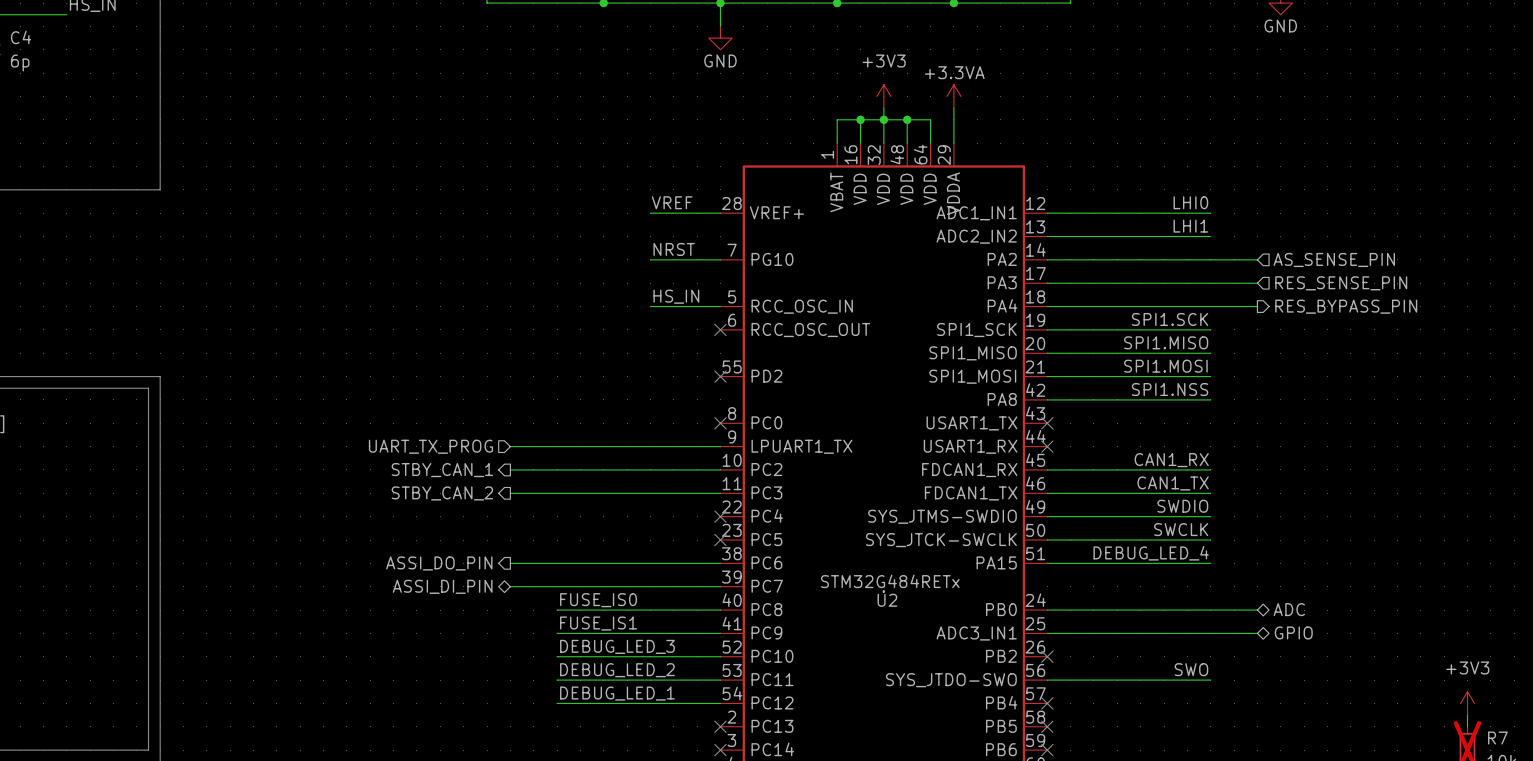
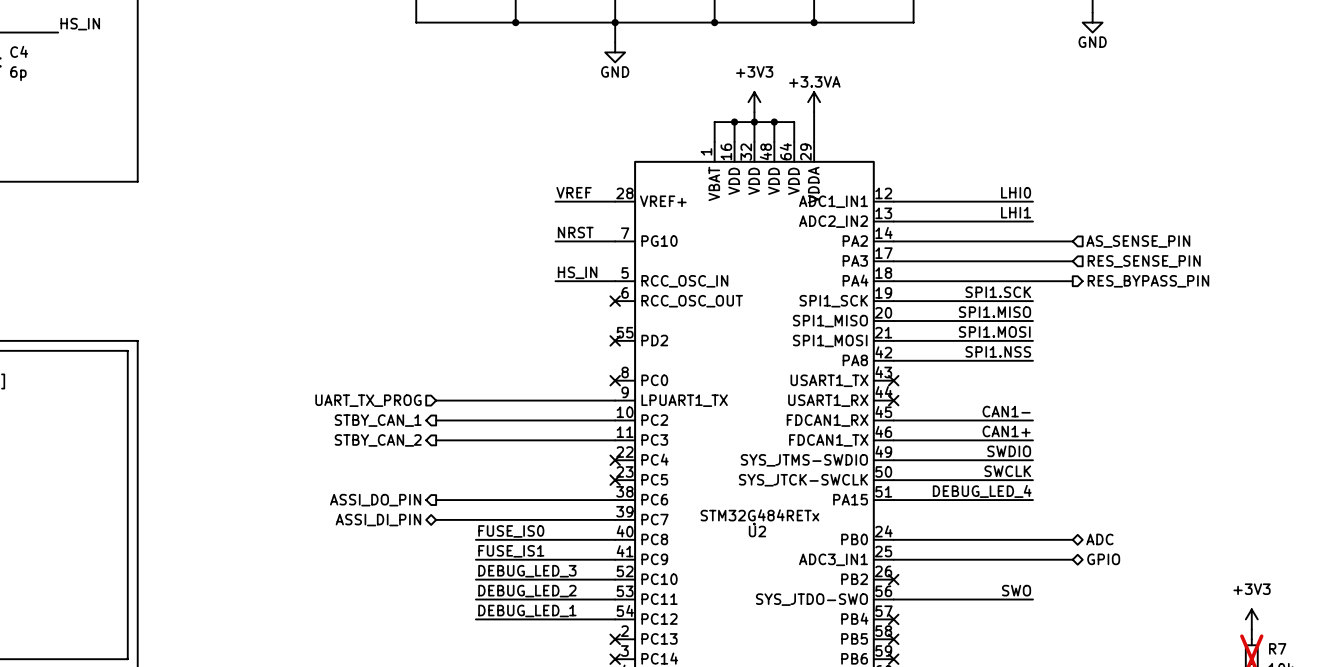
label: CAN1_RX (1171, 460) -> CAN1- (1006, 411)
label: CAN1_TX (1173, 483) -> CAN1+ (1006, 431)

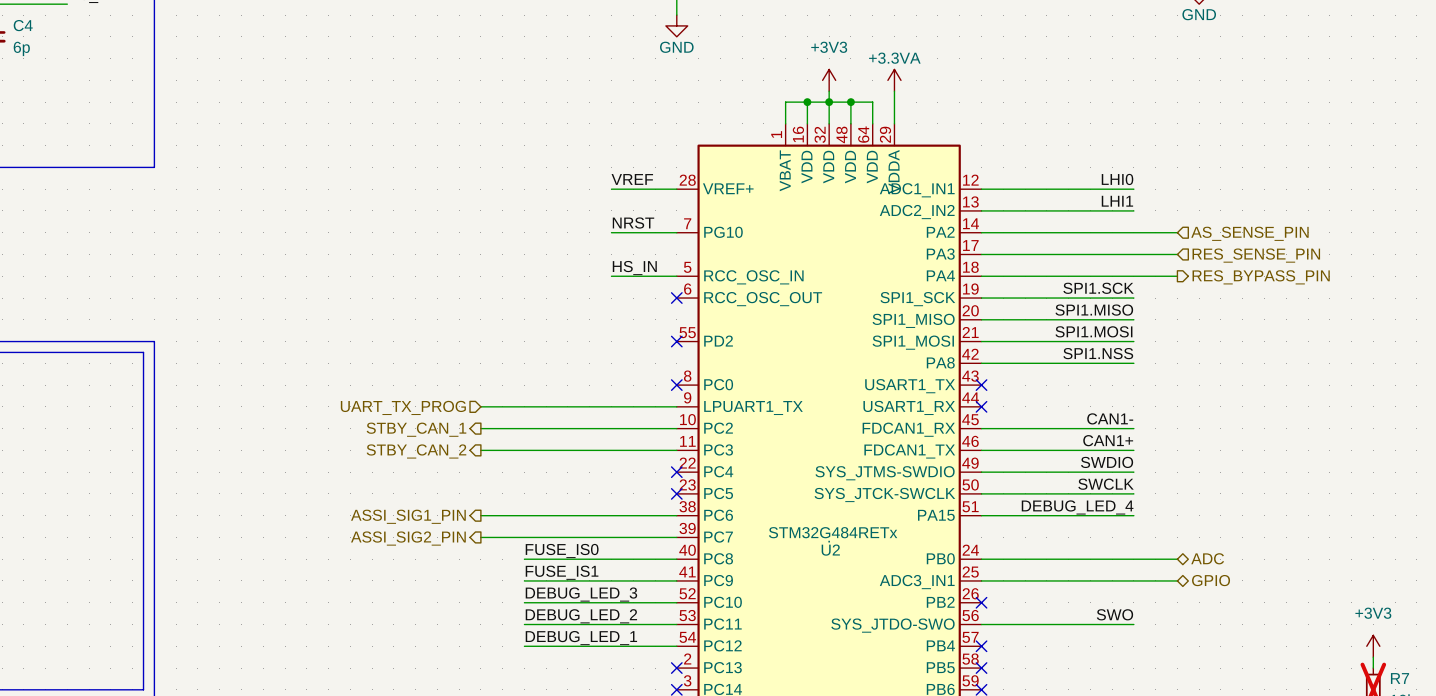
hierarchical label: ASSI_DO_PIN (375, 500) -> ASSI_SIG1_PIN (408, 516)
hierarchical label shape: bidirectional (378, 520) -> output (408, 538)
hierarchical label: ASSI_DI_PIN (378, 520) -> ASSI_SIG2_PIN (408, 538)

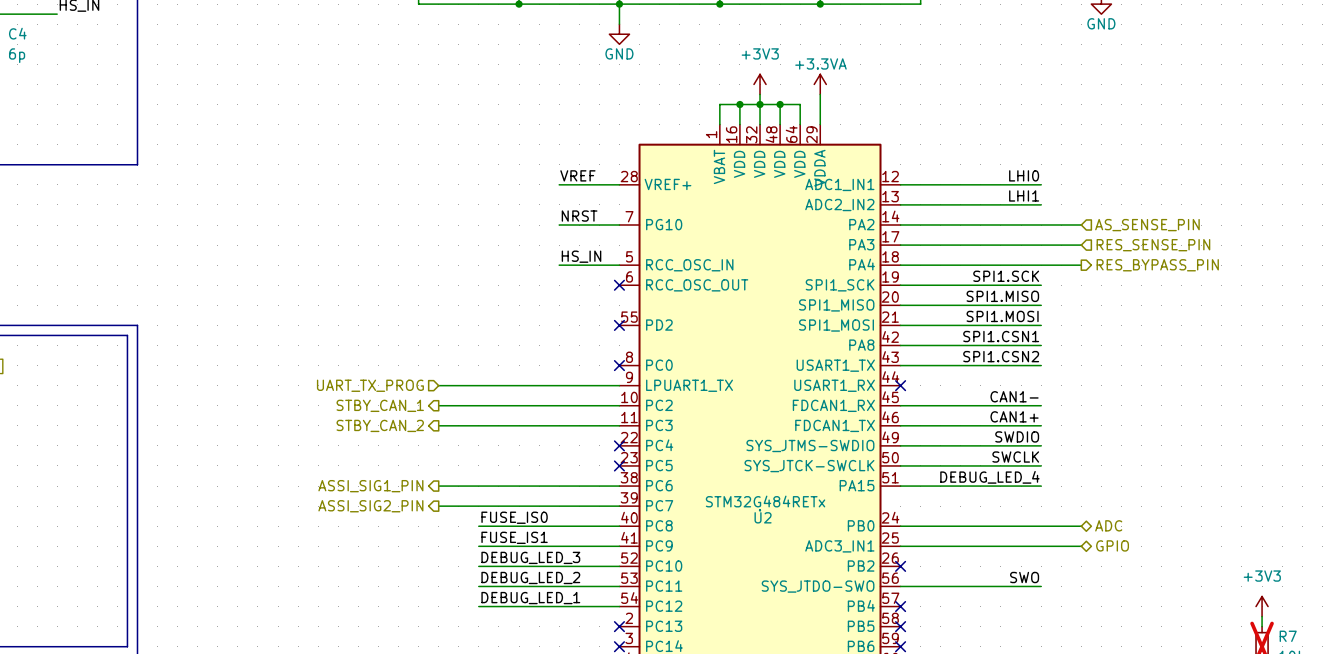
label: SPI1.NSS (1098, 353) -> SPI1.CSN1 (1001, 336)
label: none -> SPI1.CSN2 (1001, 356)
wire: none -> (900, 365) (1041, 365)
no-connect mark: (981, 385) -> none

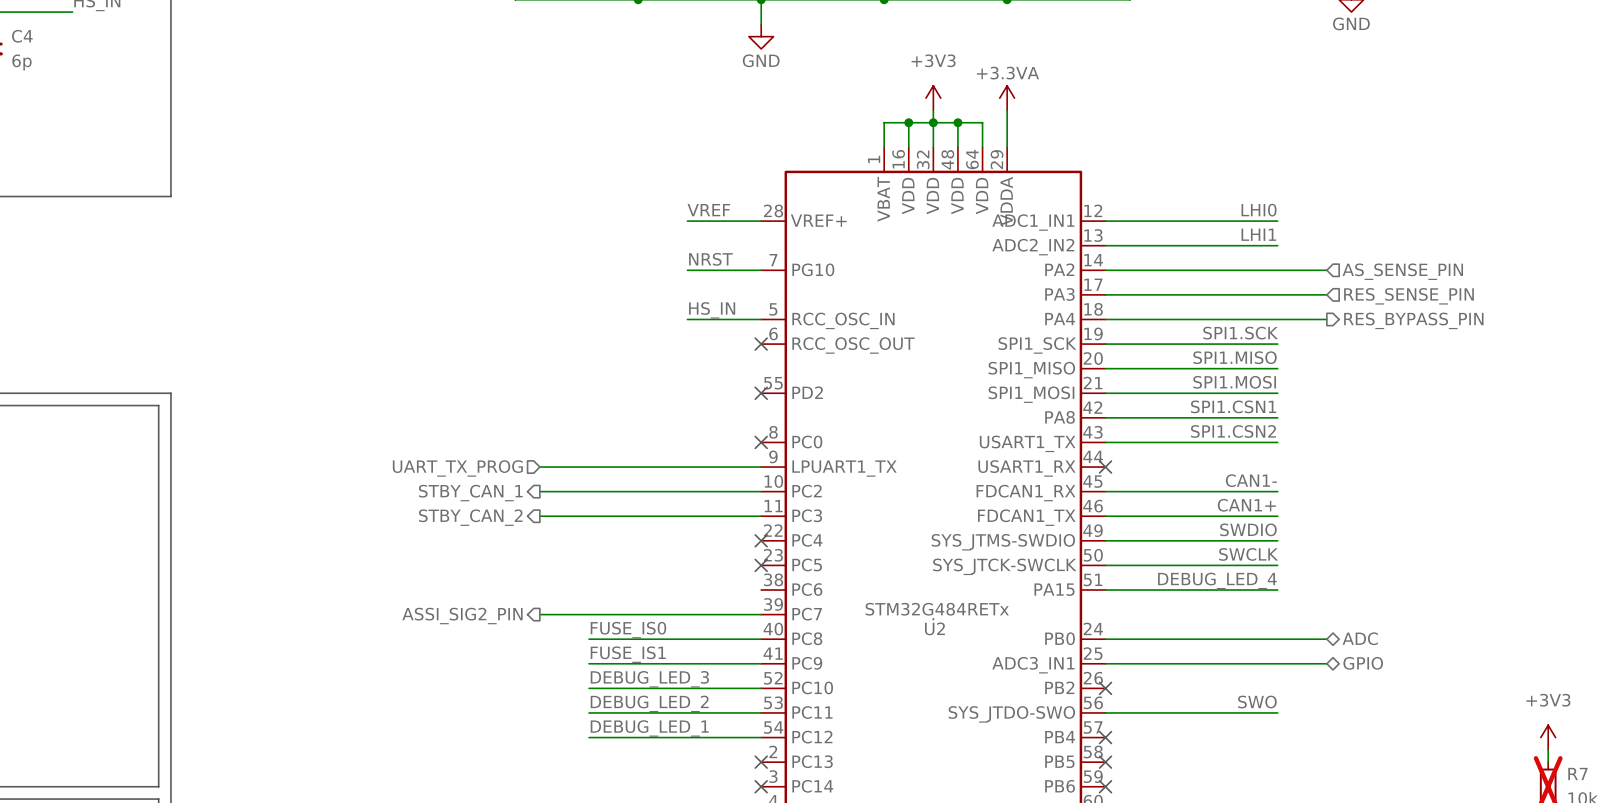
hierarchical label: ASSI_SIG1_PIN (370, 486) -> none
wire: (438, 486) (619, 486) -> none

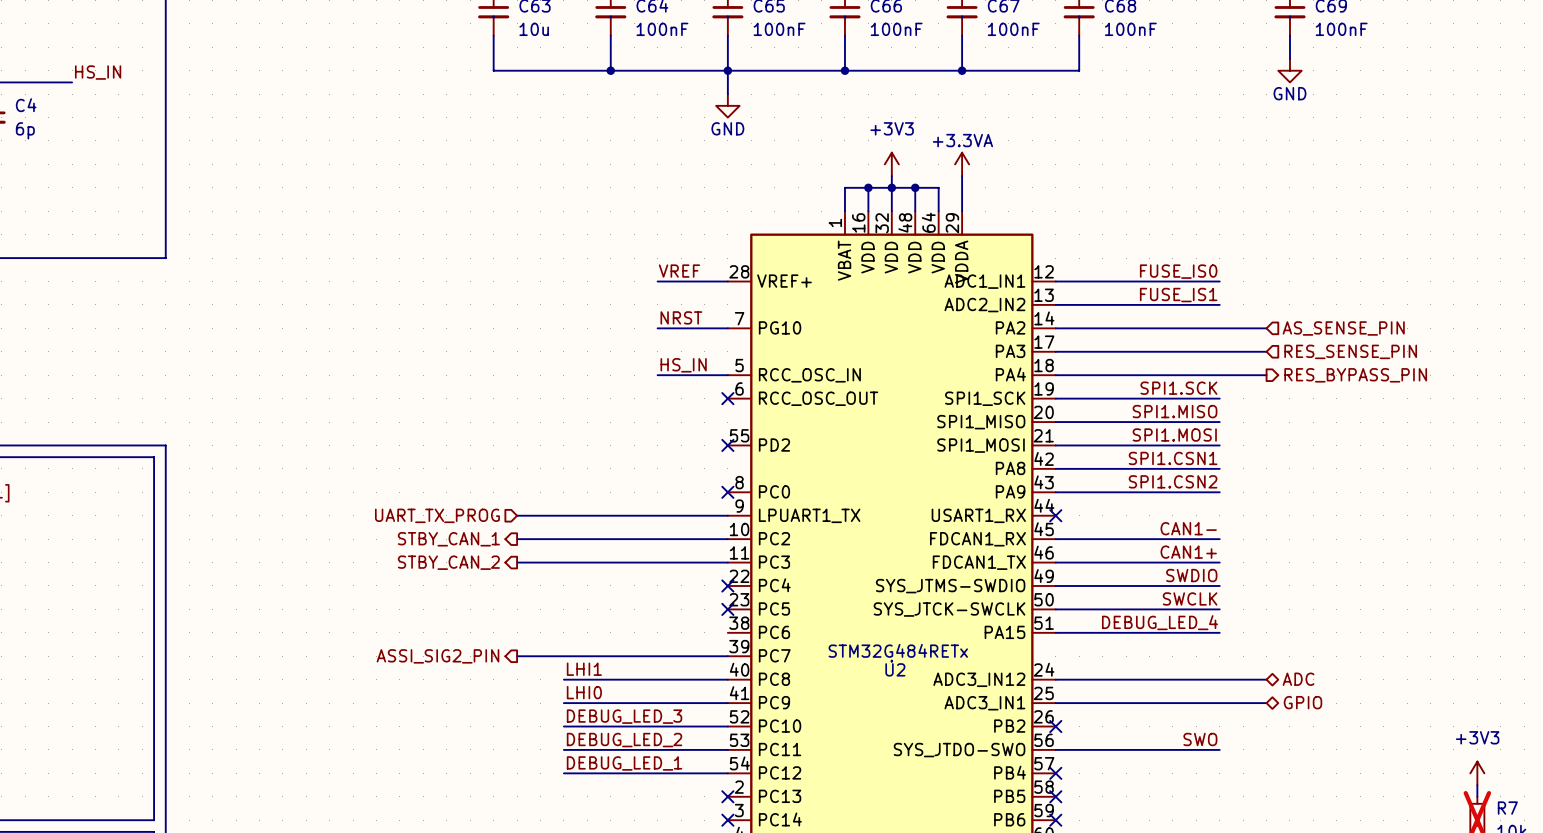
label: LHI0 (1259, 210) -> FUSE_IS0 (1178, 271)
label: LHI1 (1258, 234) -> FUSE_IS1 (1178, 295)
U2 pin name: USART1_TX (1027, 443) -> PA9 (1010, 491)
label: FUSE_IS0 (628, 630) -> LHI1 (584, 669)
U2 pin name: PB0 (1060, 638) -> ADC3_IN12 (979, 679)
label: FUSE_IS1 (628, 654) -> LHI0 (584, 692)

